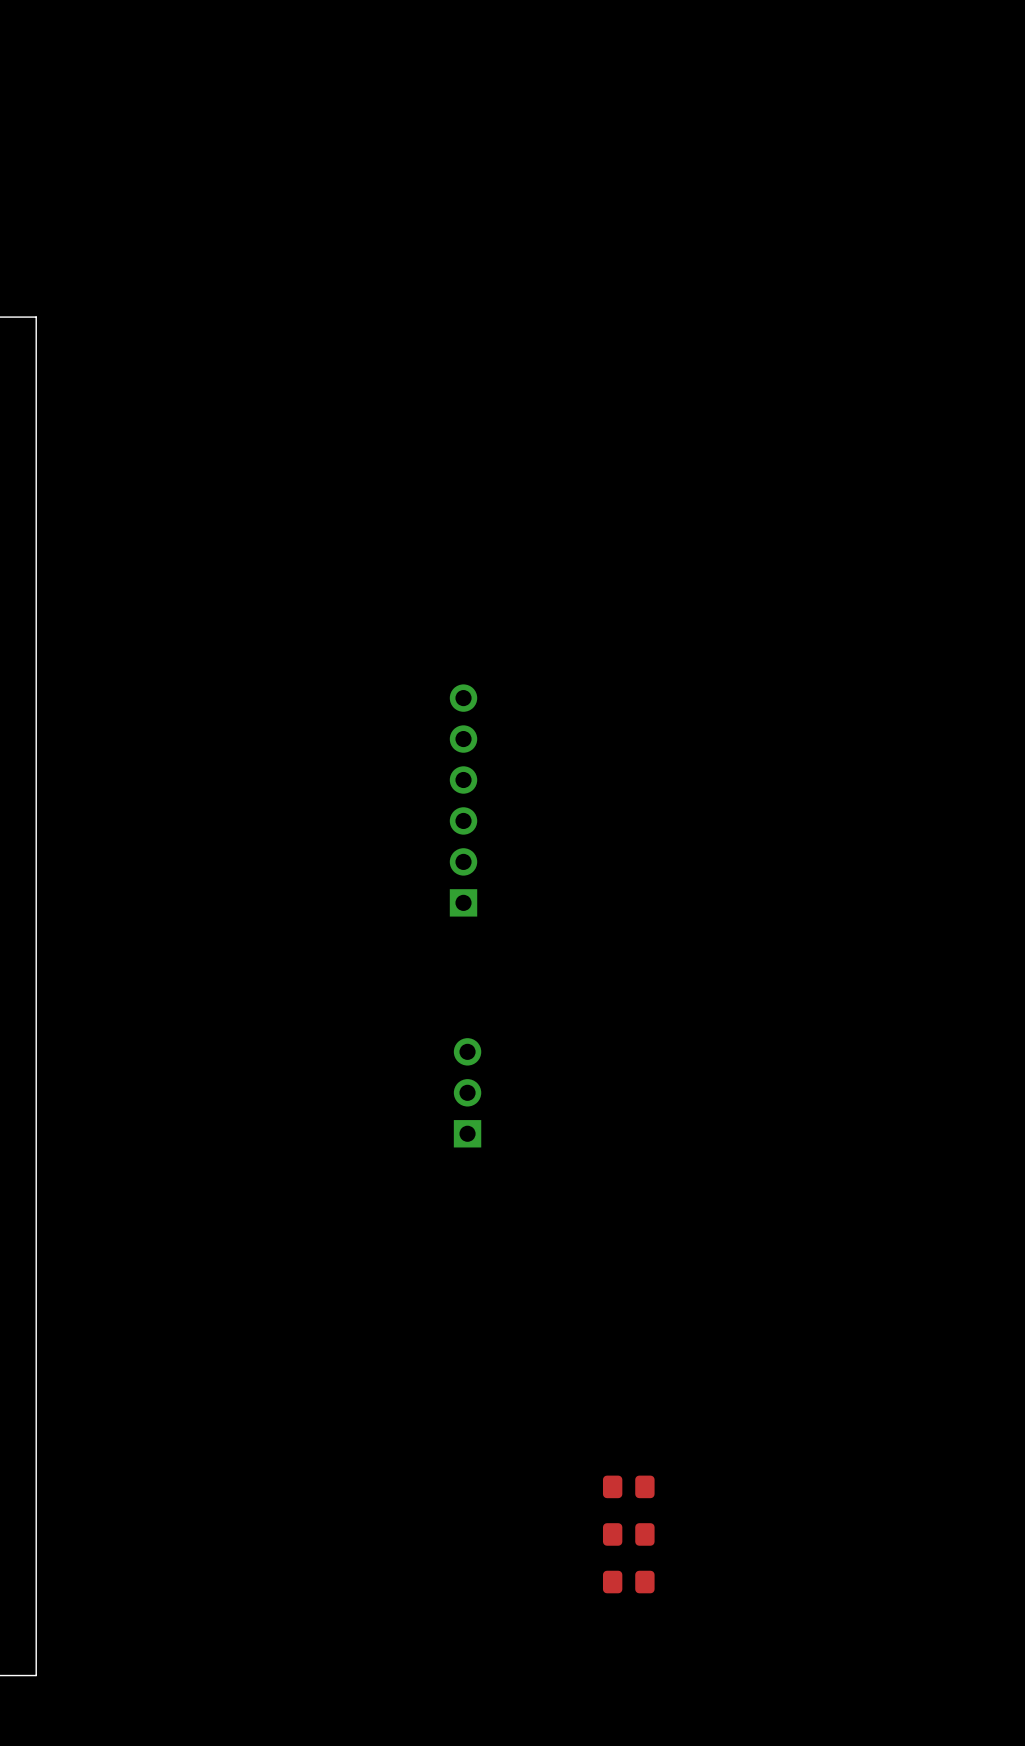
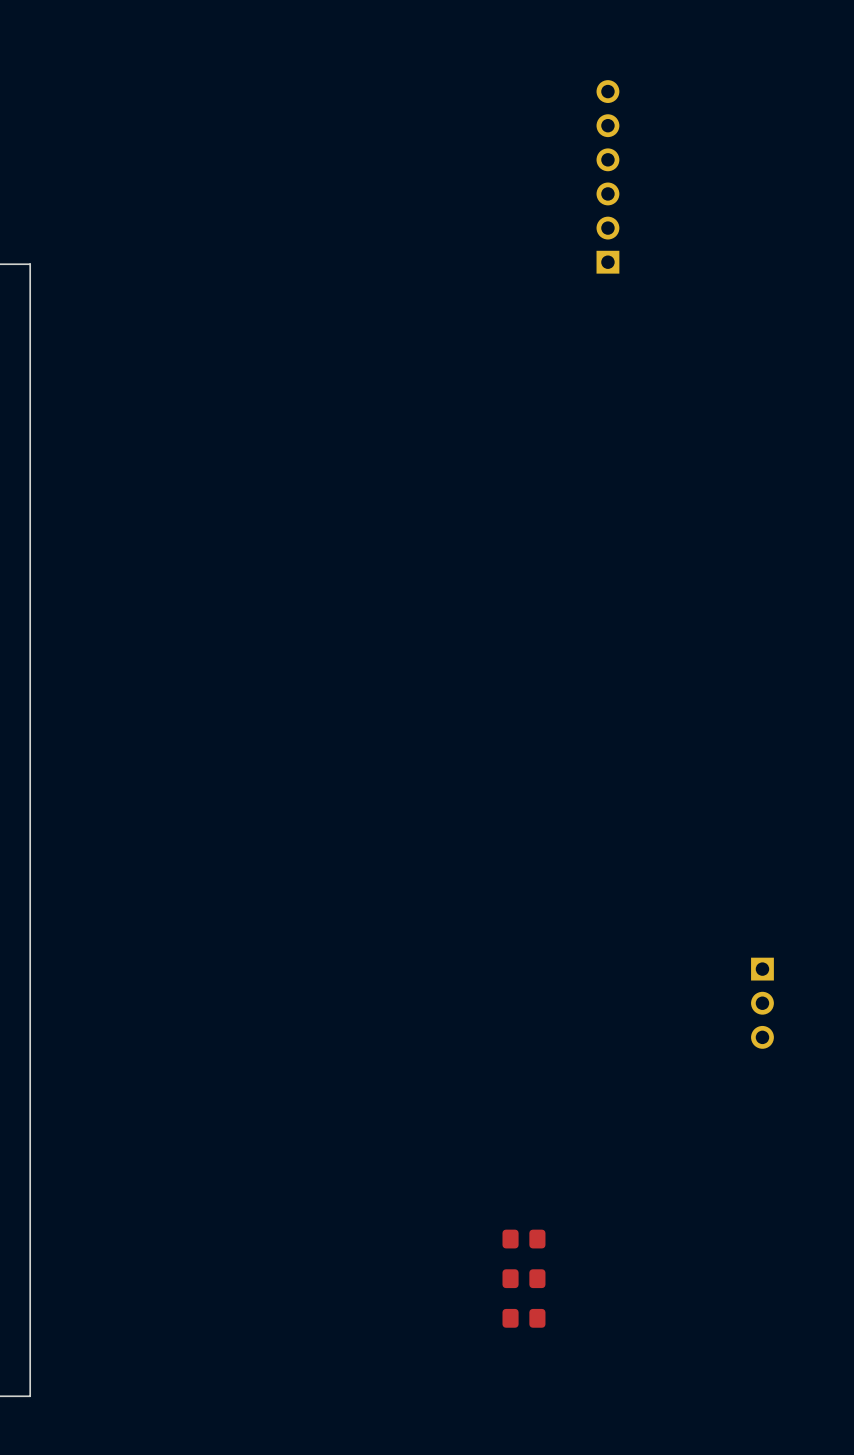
part: none -> (607, 176)
part: (463, 800) -> none
part: (467, 1092) -> none
part: none -> (762, 1003)

